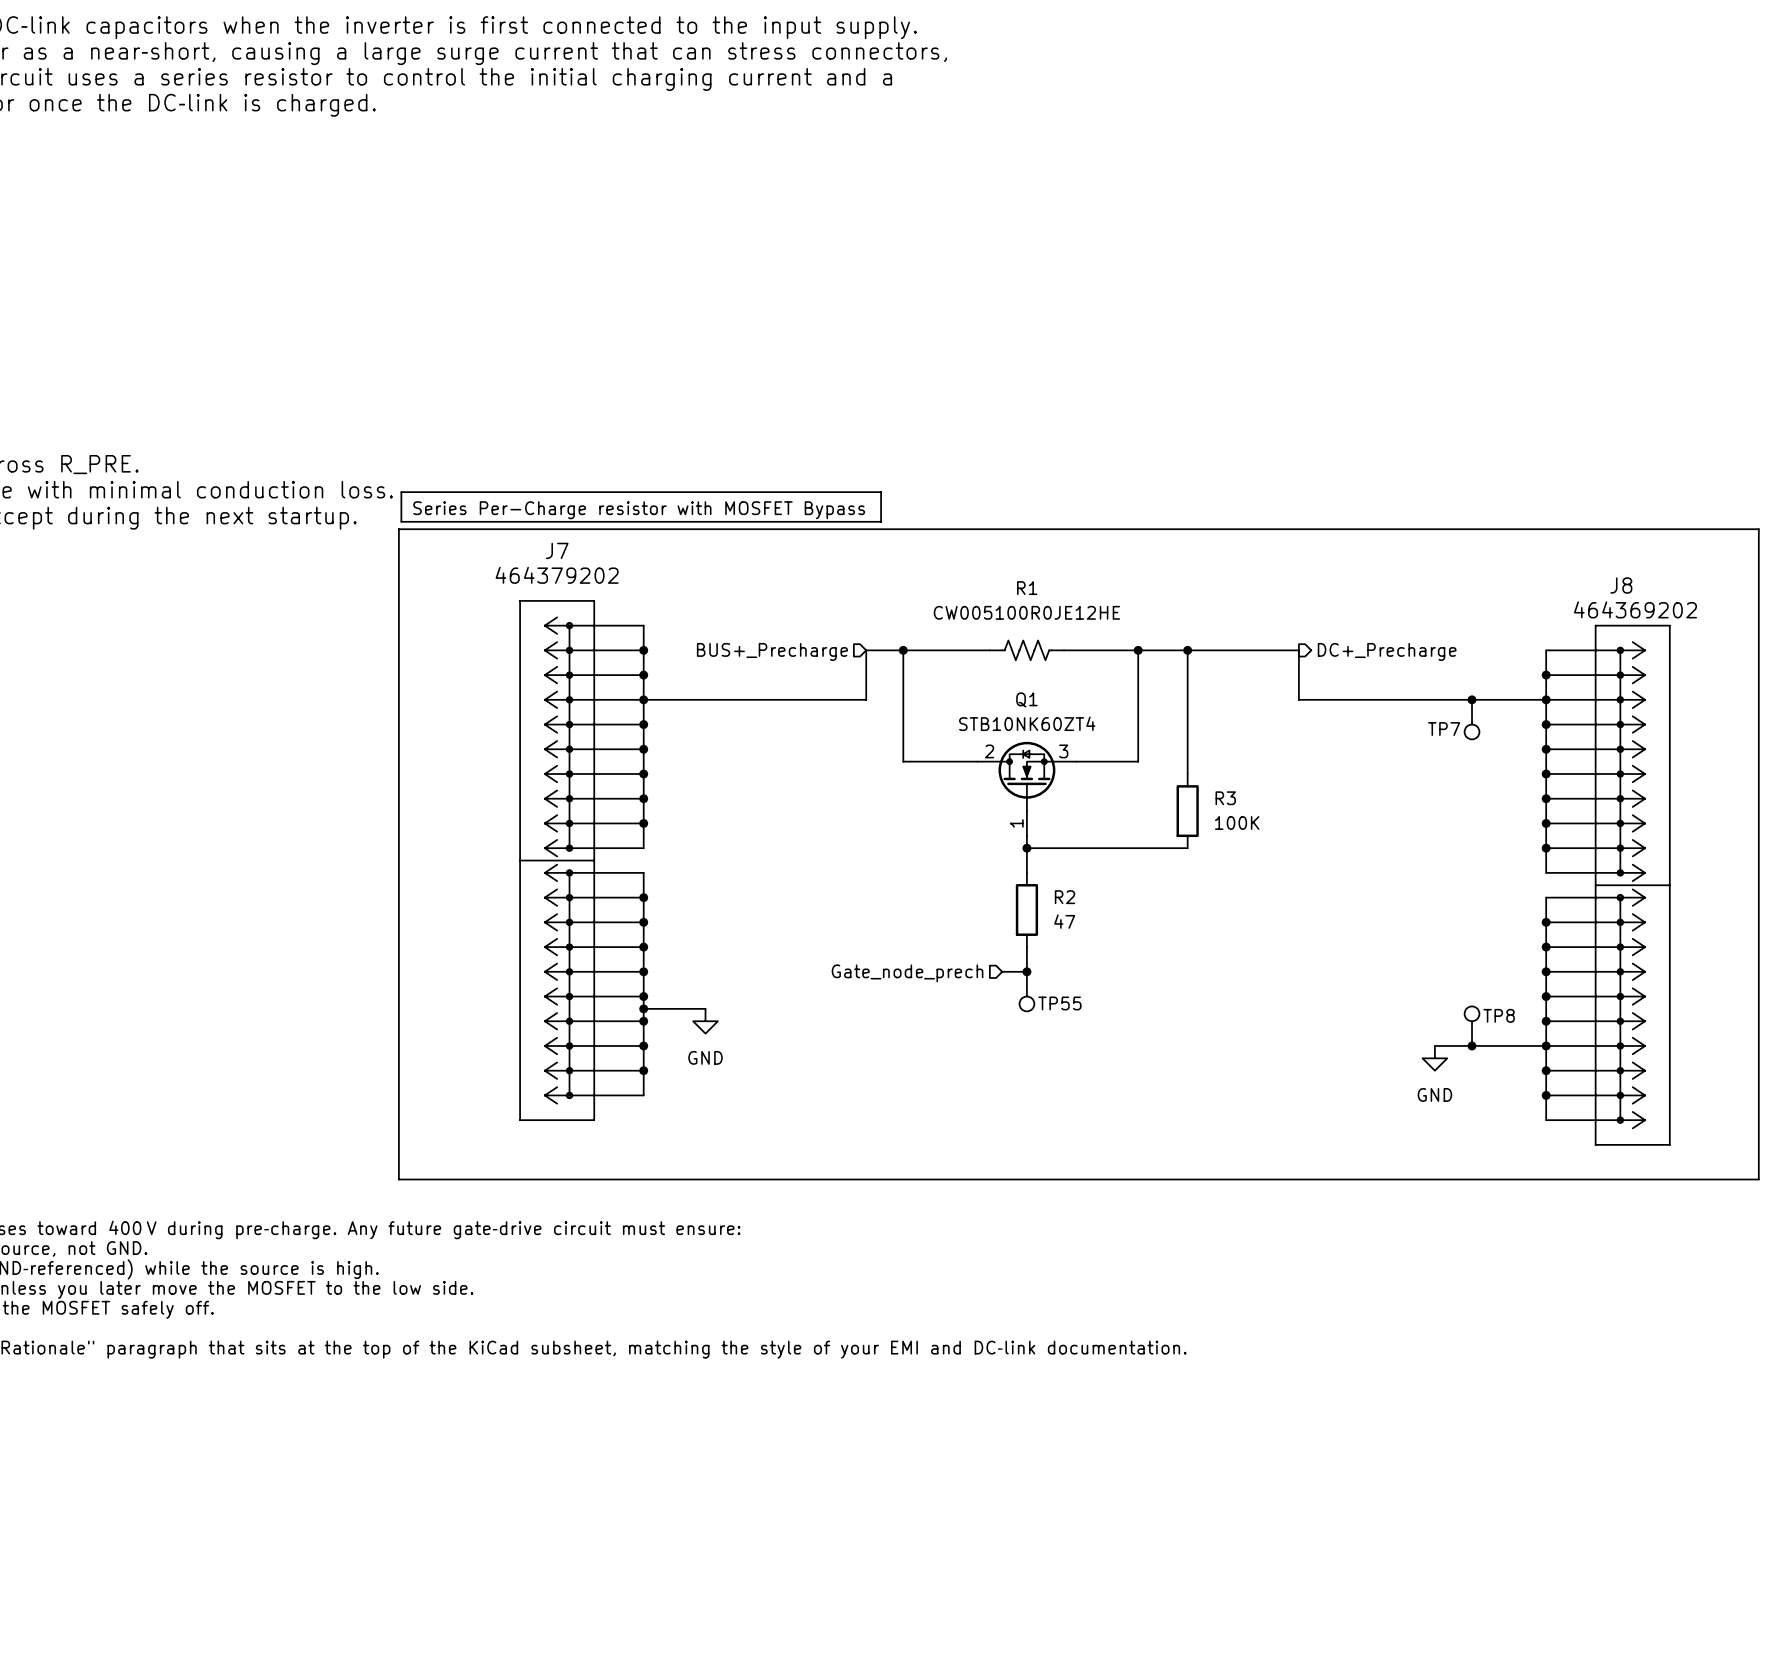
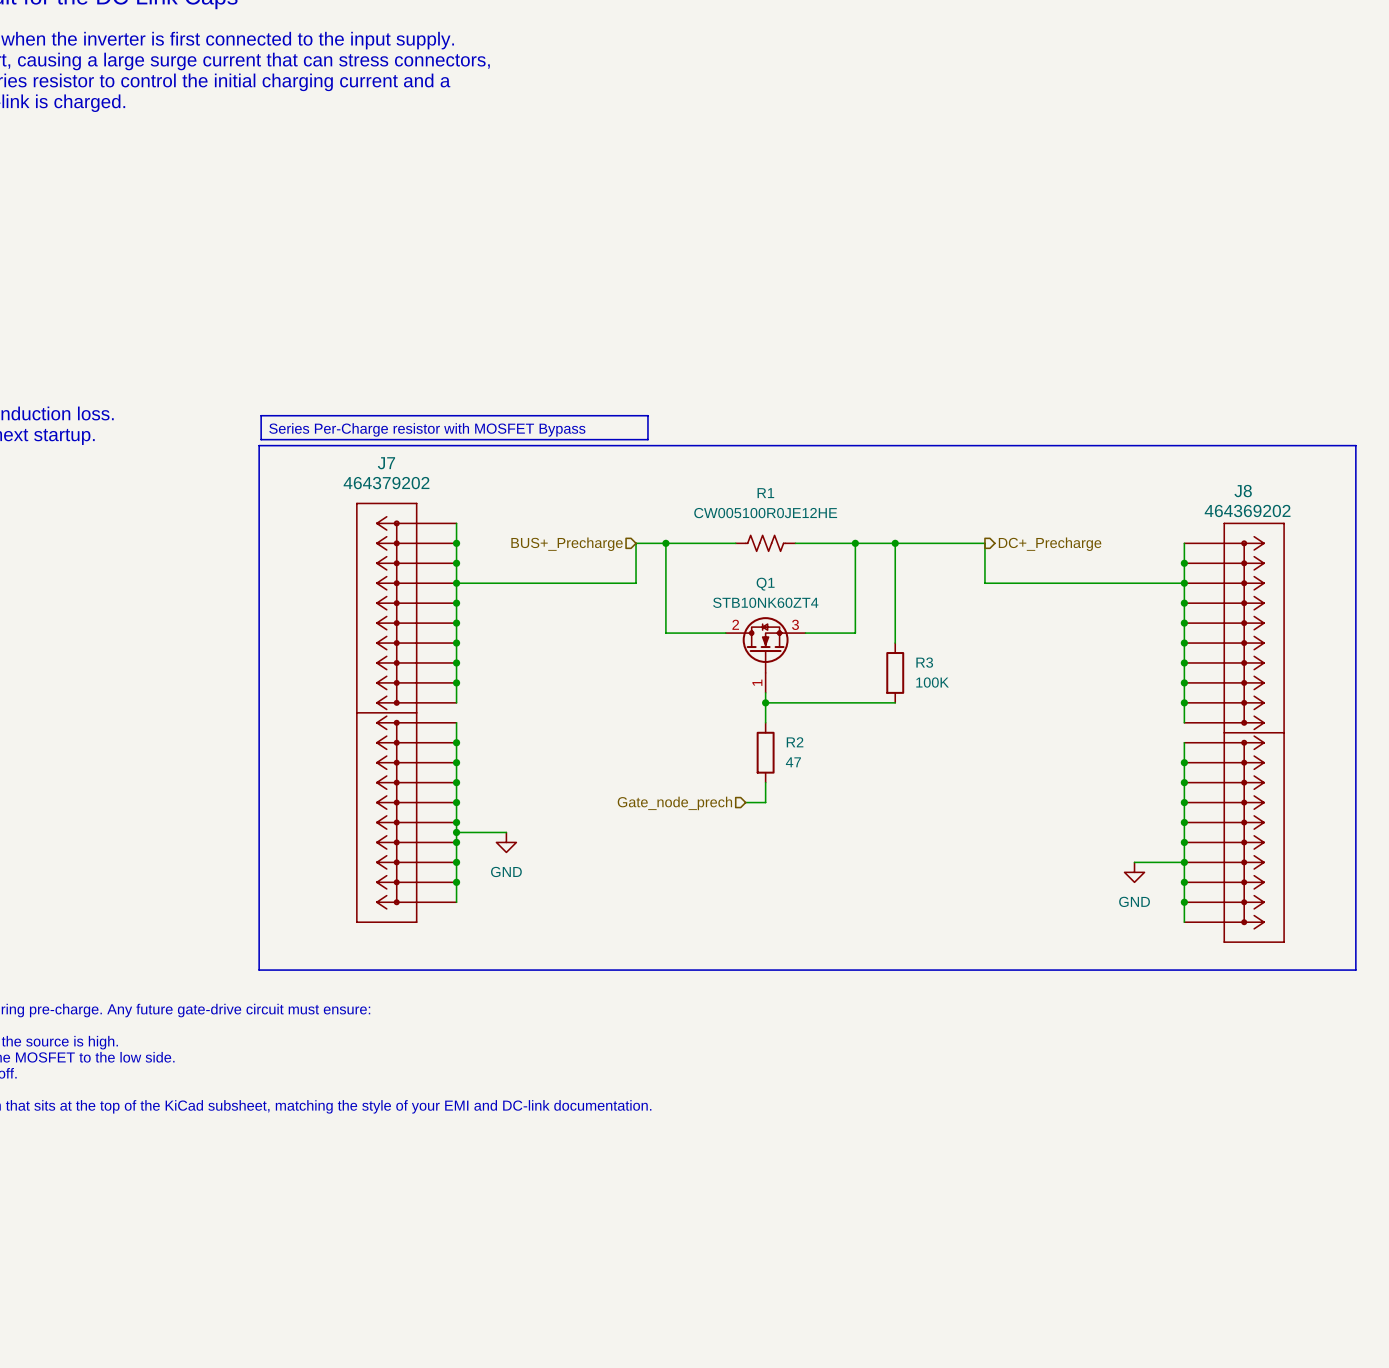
junction: (1472, 699) -> none
TP7: (1472, 719) -> none
junction: (1026, 971) -> none
TP55: (1026, 991) -> none
TP8: (1472, 1026) -> none
wire: (1434, 1045) (1484, 1045) -> none
junction: (1472, 1045) -> none
power symbol position: GND (1434, 1058) -> GND (1134, 872)

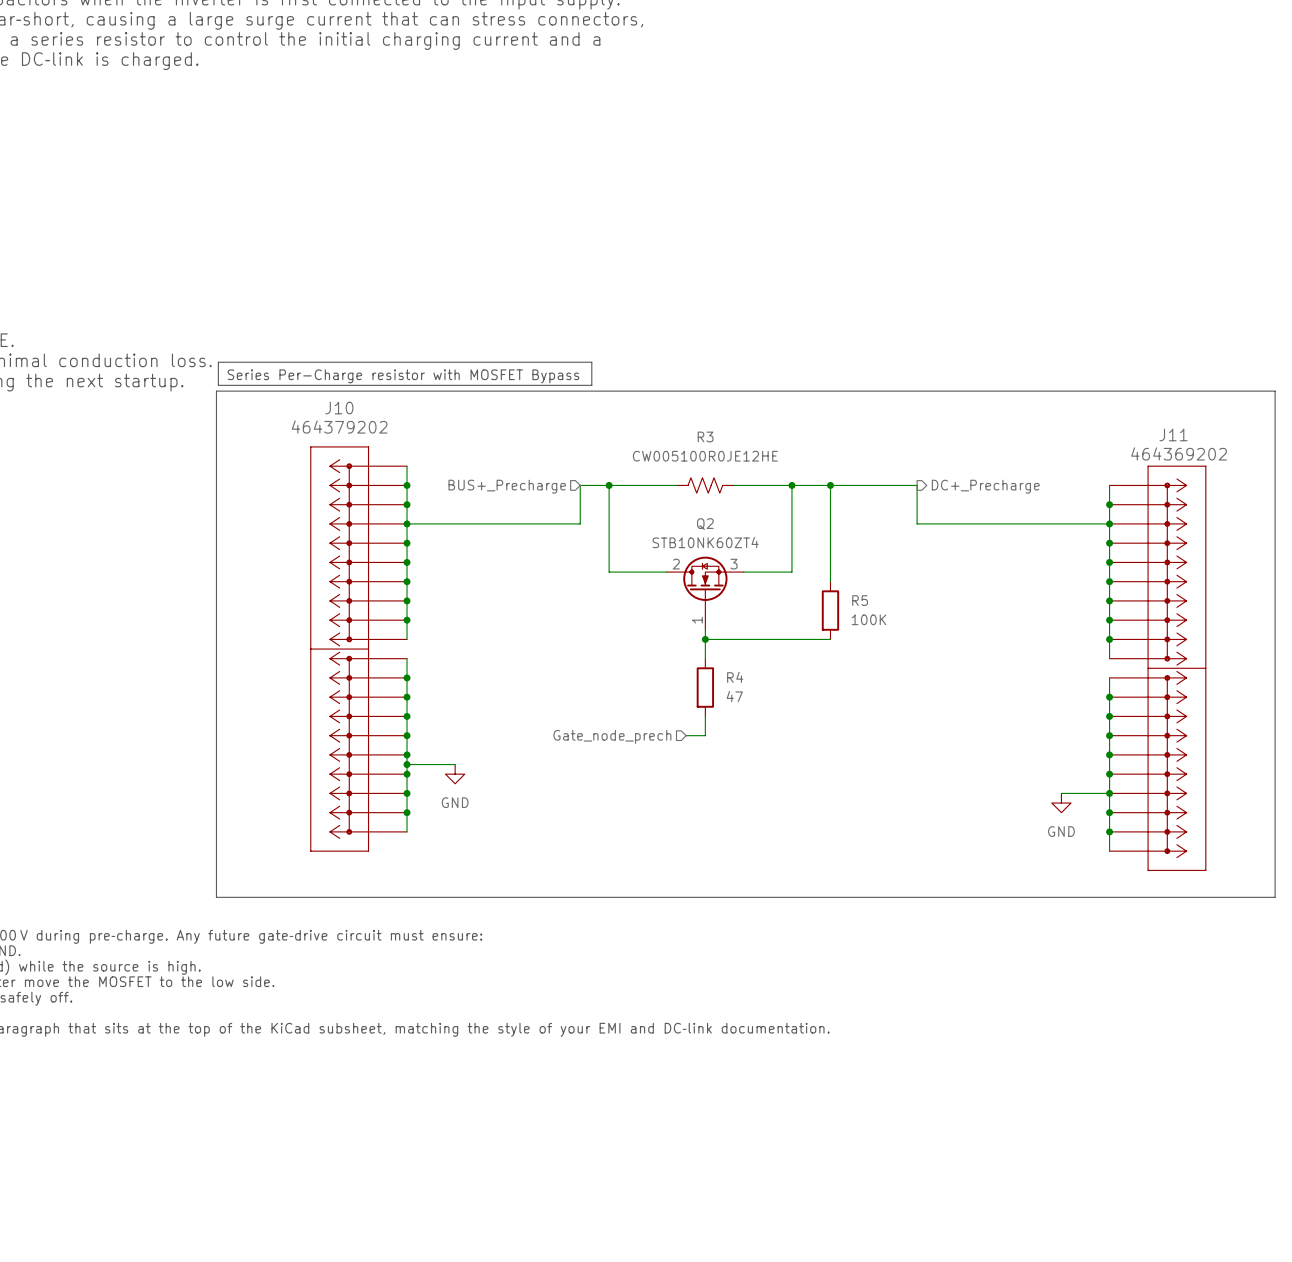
J7 name: J7 (386, 463) -> J10 (339, 408)
J8 name: J8 (1243, 491) -> J11 (1173, 434)
R1 name: R1 (765, 493) -> R3 (705, 436)
Q1 name: Q1 (765, 584) -> Q2 (705, 524)
R3 name: R3 (924, 662) -> R5 (860, 600)
R2 name: R2 (795, 742) -> R4 (735, 677)

